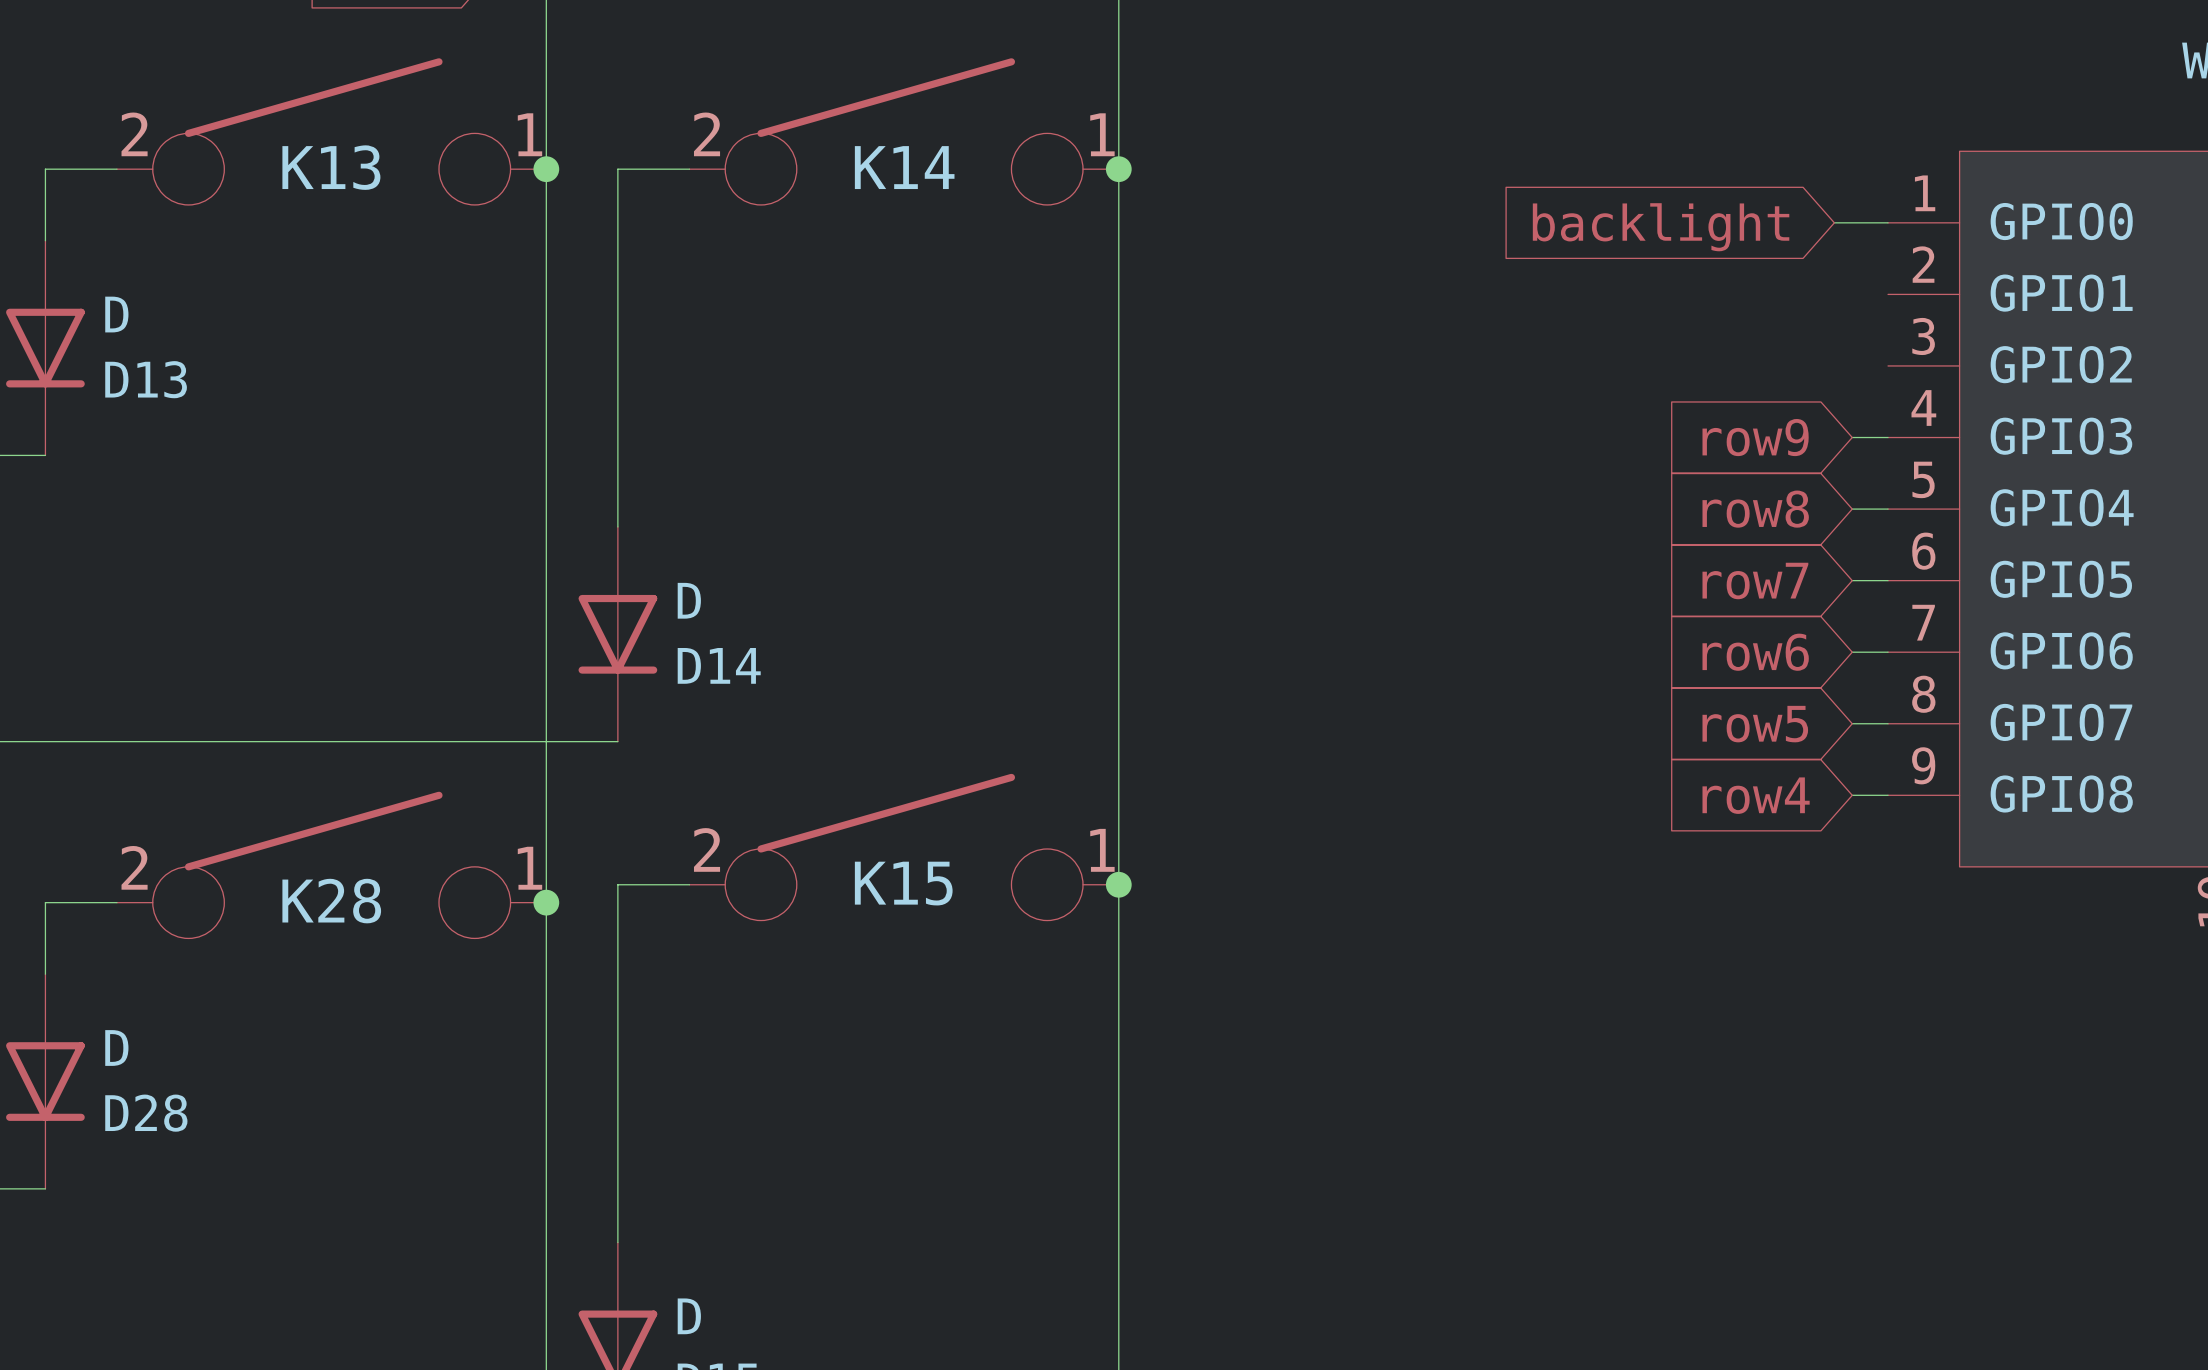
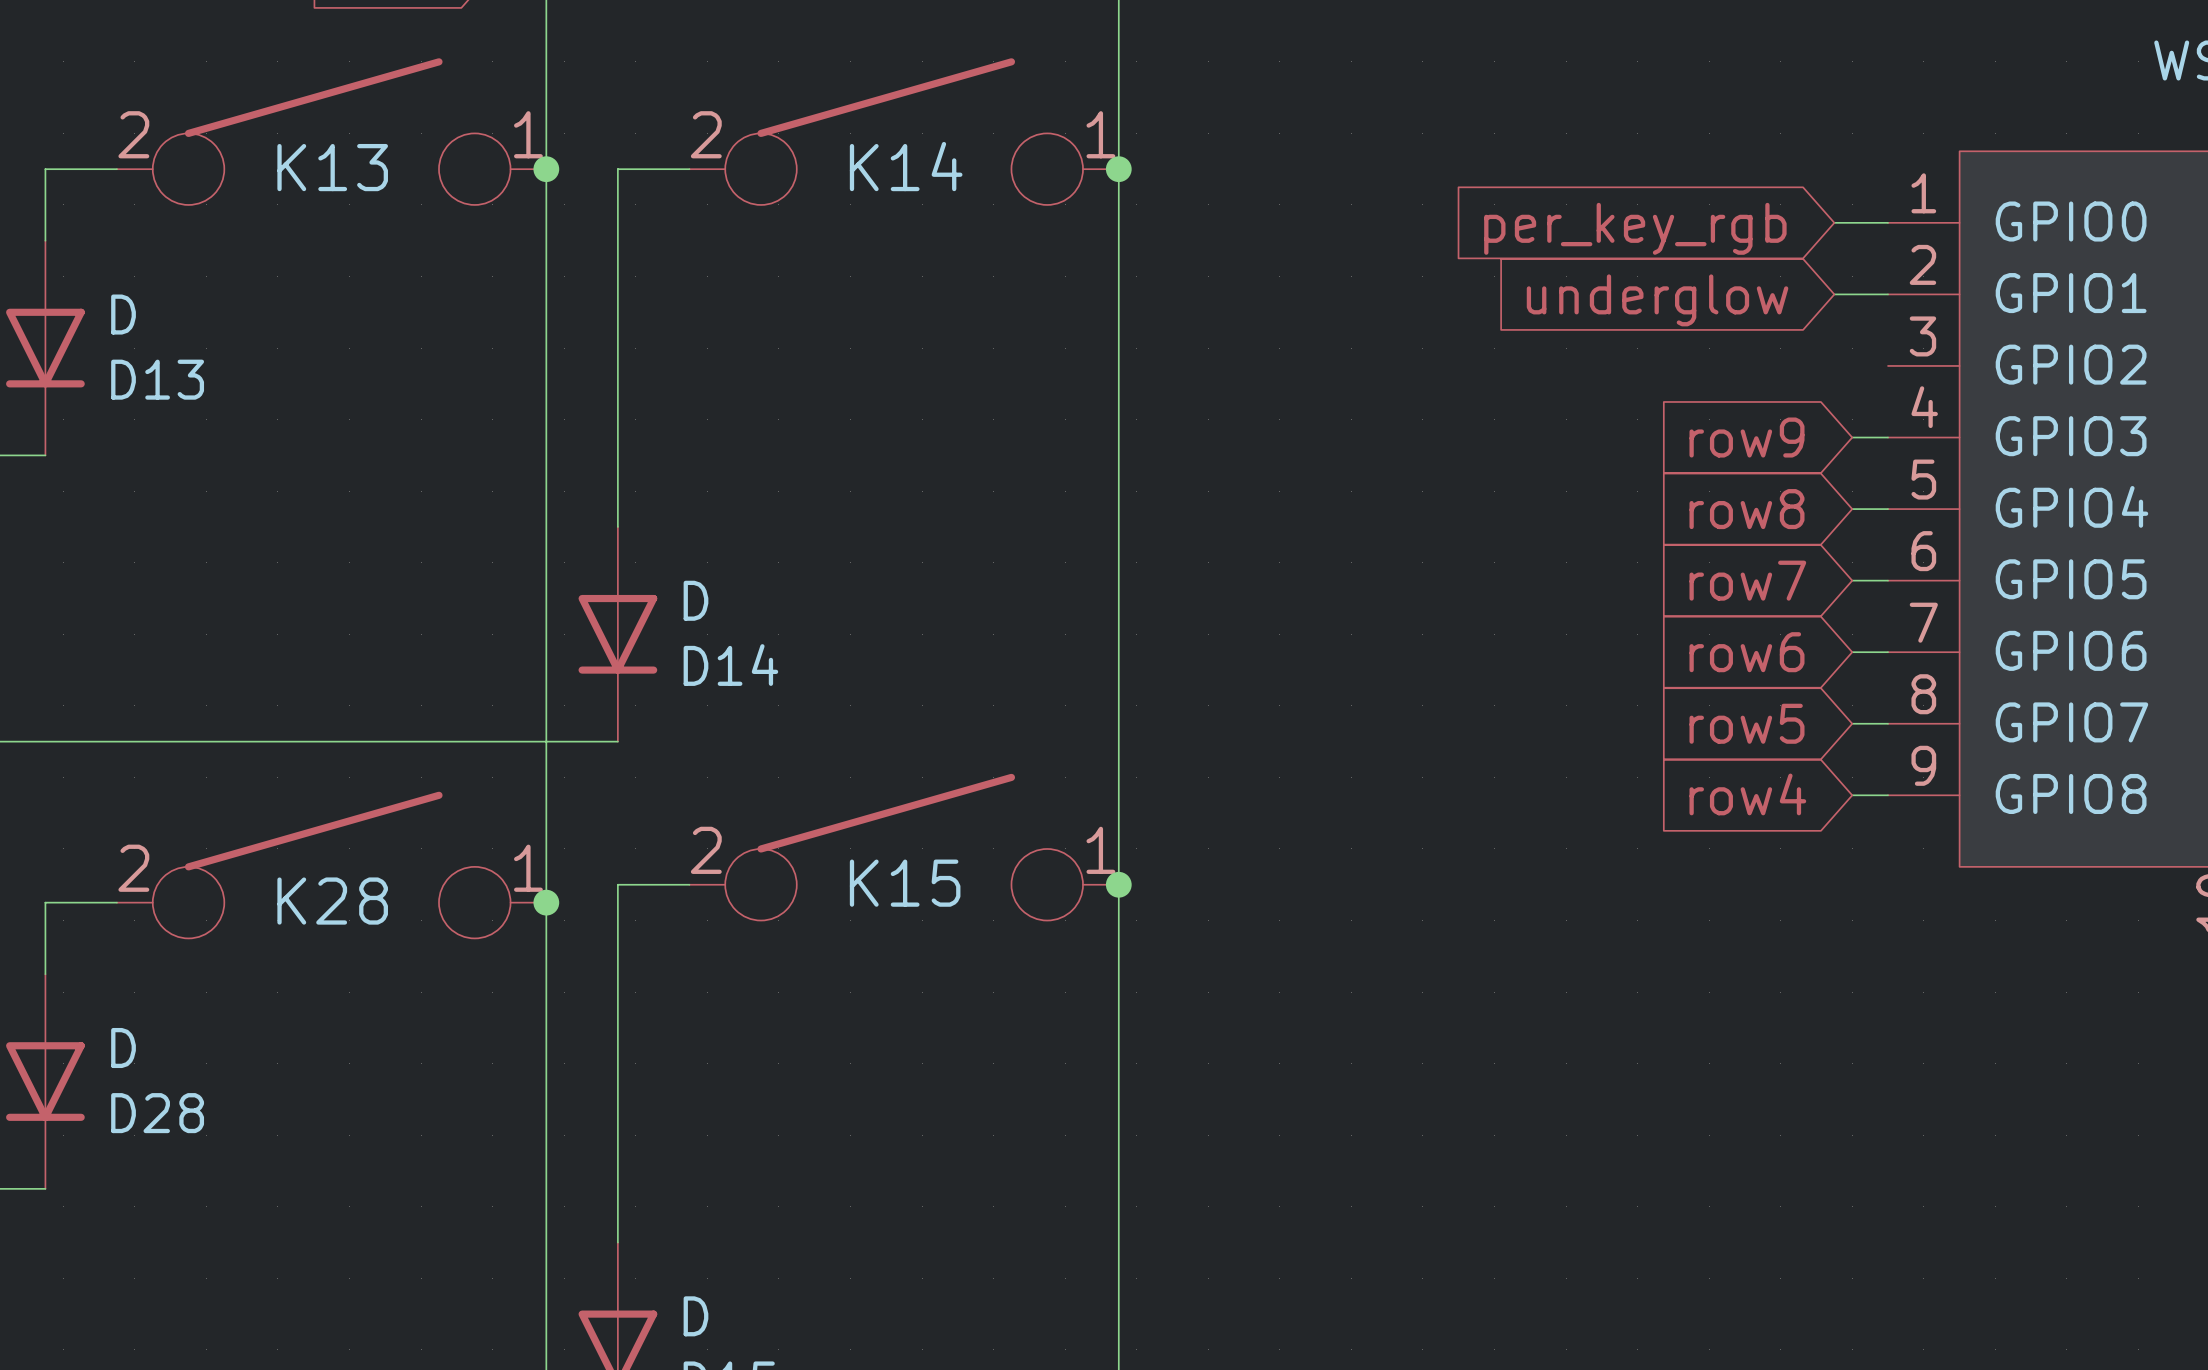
global label: backlight (1661, 227) -> per_key_rgb (1635, 228)
wire: none -> (1834, 294) (1888, 294)
global label: none -> underglow (1657, 300)

